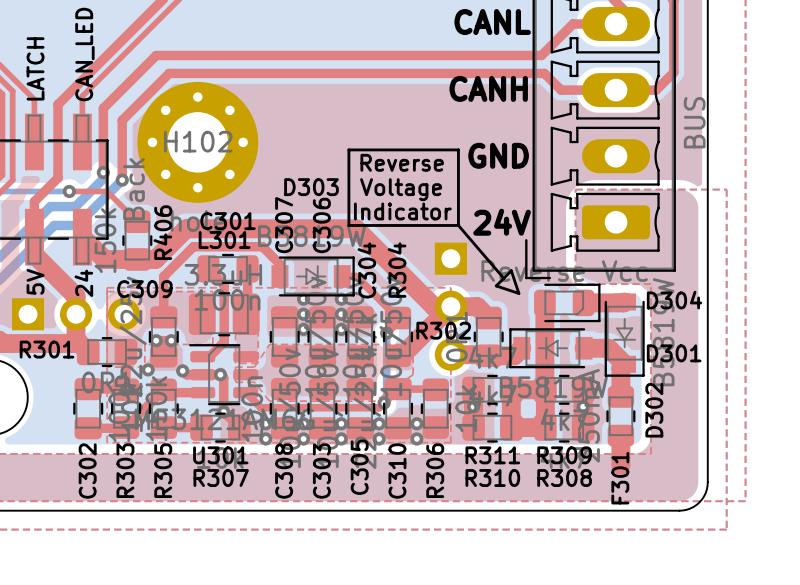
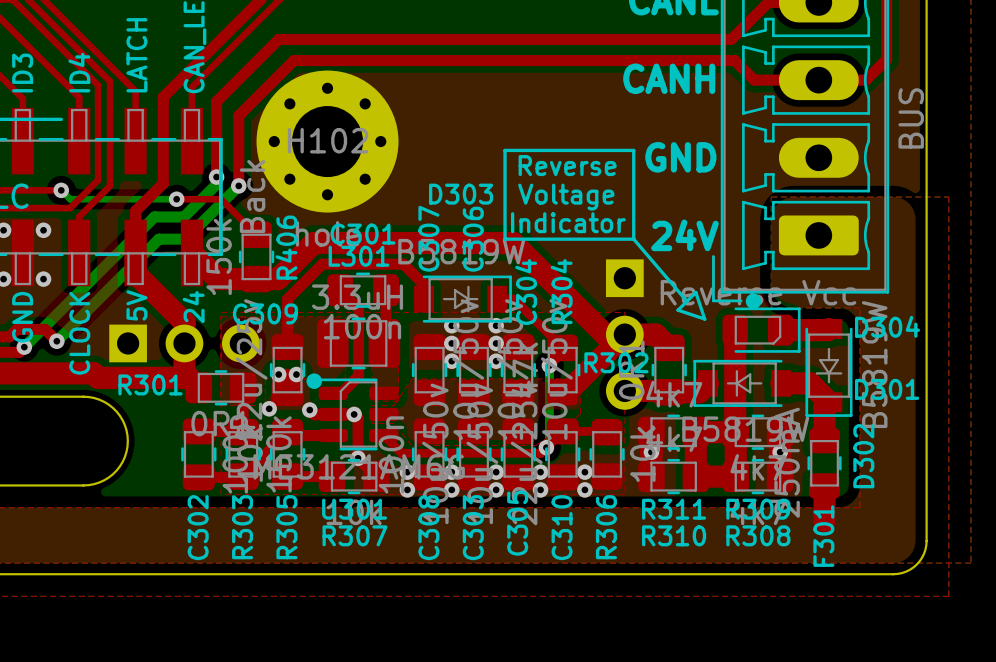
drawing: none -> [745, 293, 762, 310]
drawing: none -> [306, 373, 322, 389]

